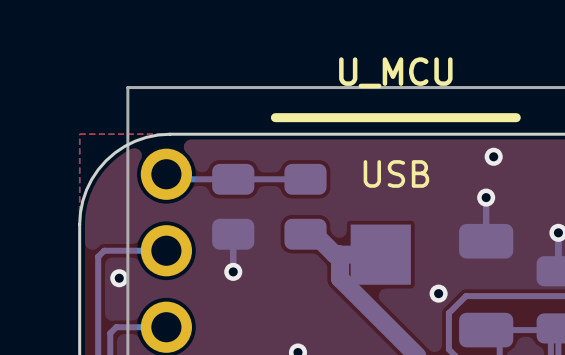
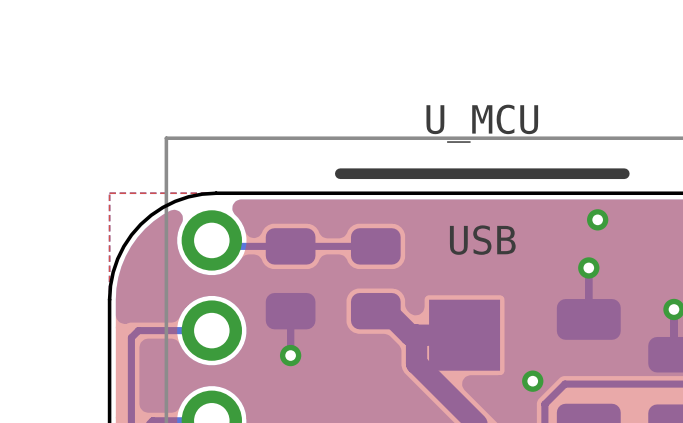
via: (119, 278) -> none

